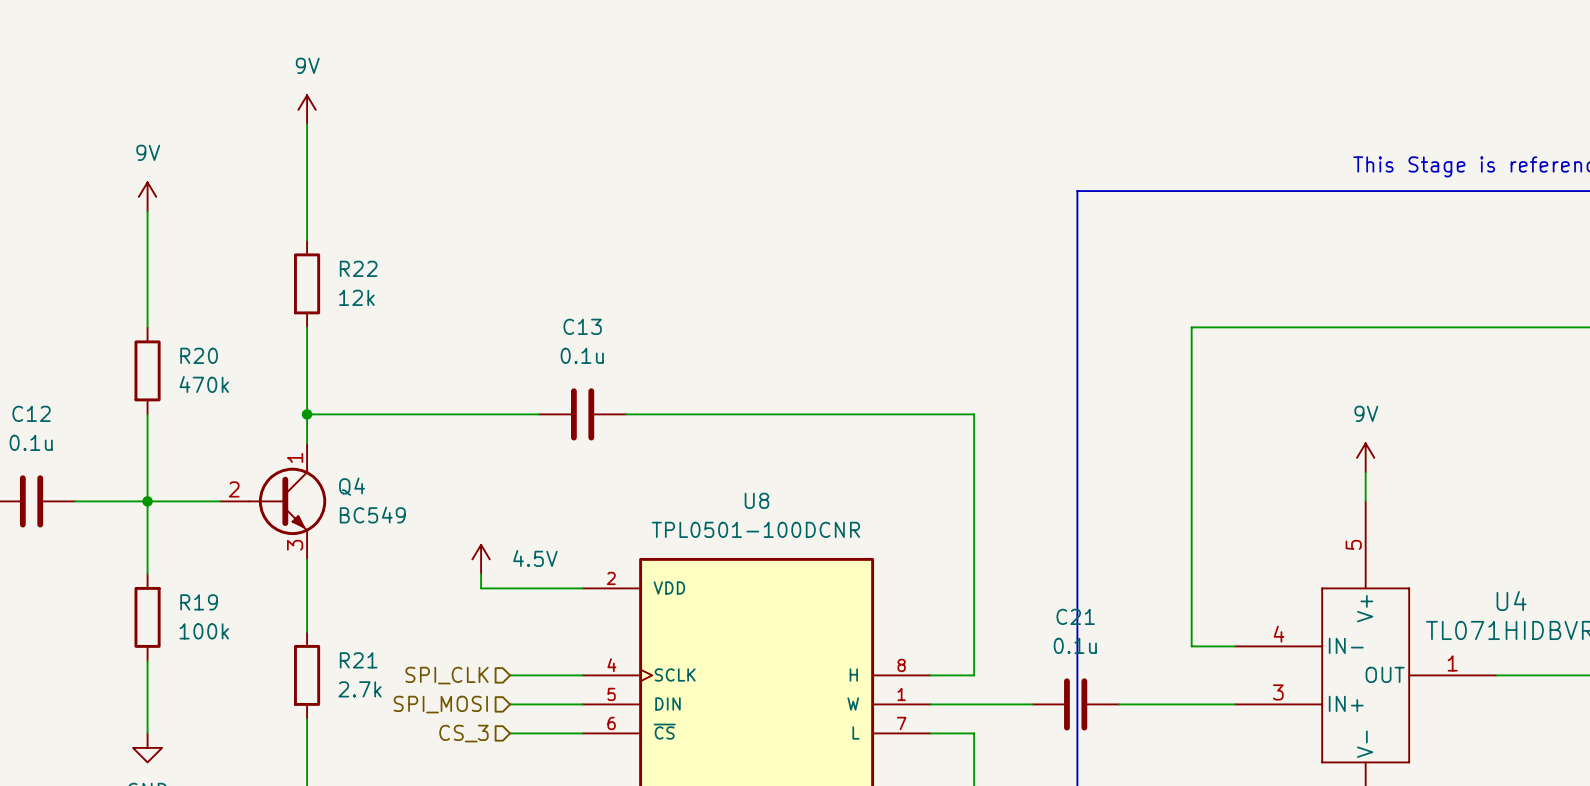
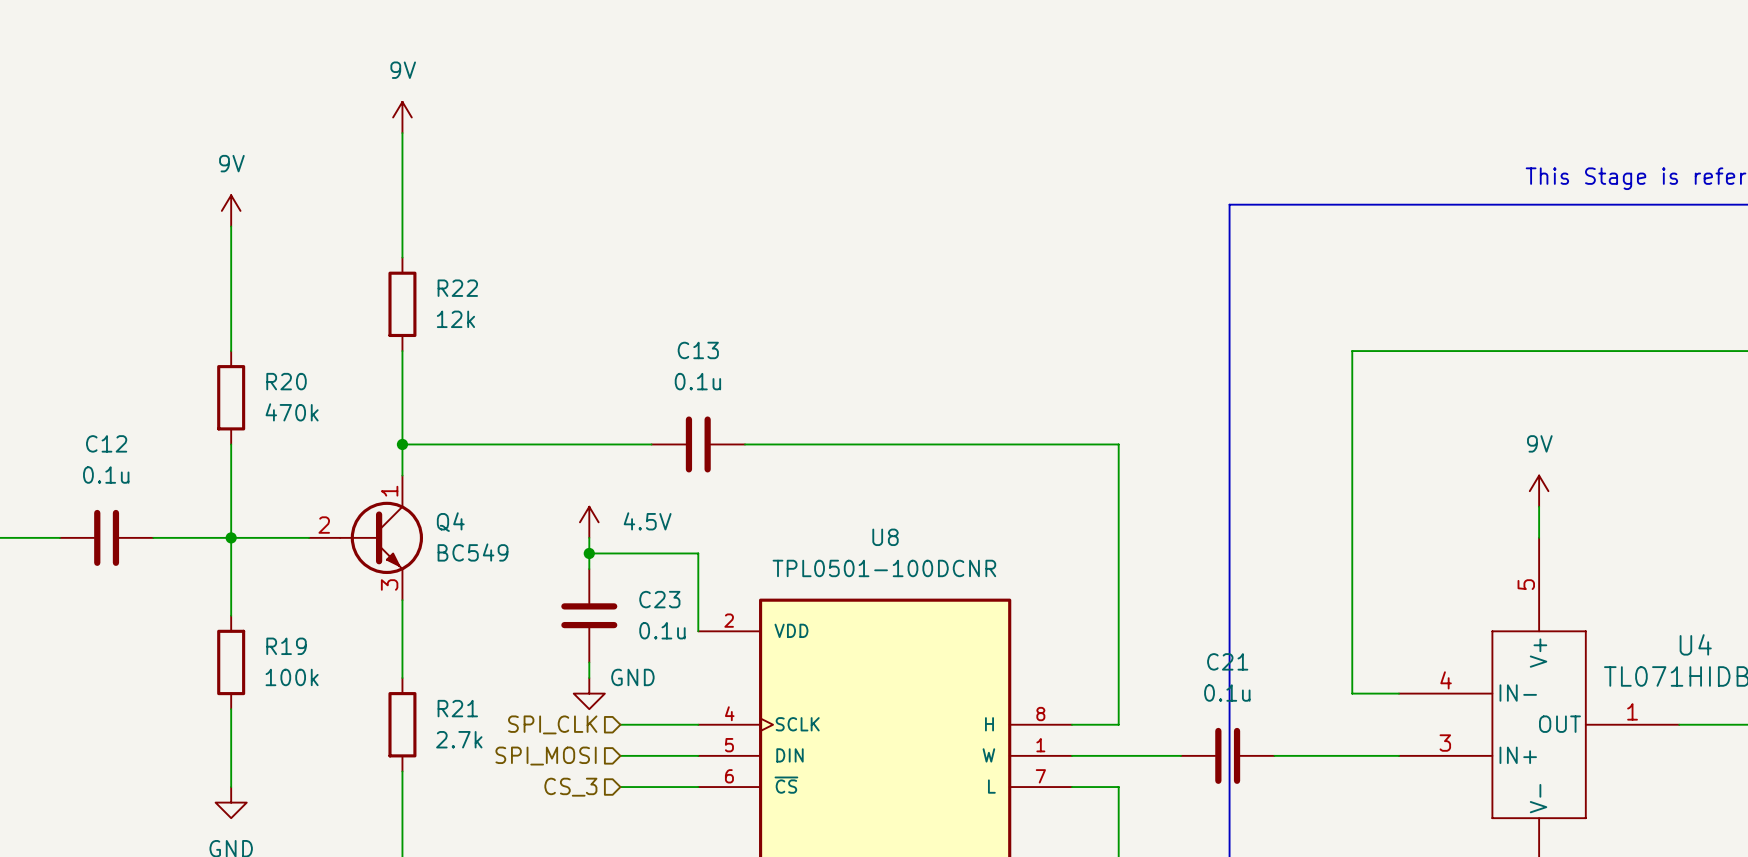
wire: none -> (589, 537) (589, 569)
junction: none -> (589, 553)
power symbol position: 4.5V (481, 559) -> 4.5V (589, 522)
wire: (481, 573) (481, 588) (582, 588) -> (589, 553) (698, 553) (698, 631)
C23: none -> 0.1u (589, 615)
wire: none -> (589, 662) (589, 678)
power symbol: none -> GND (589, 693)

